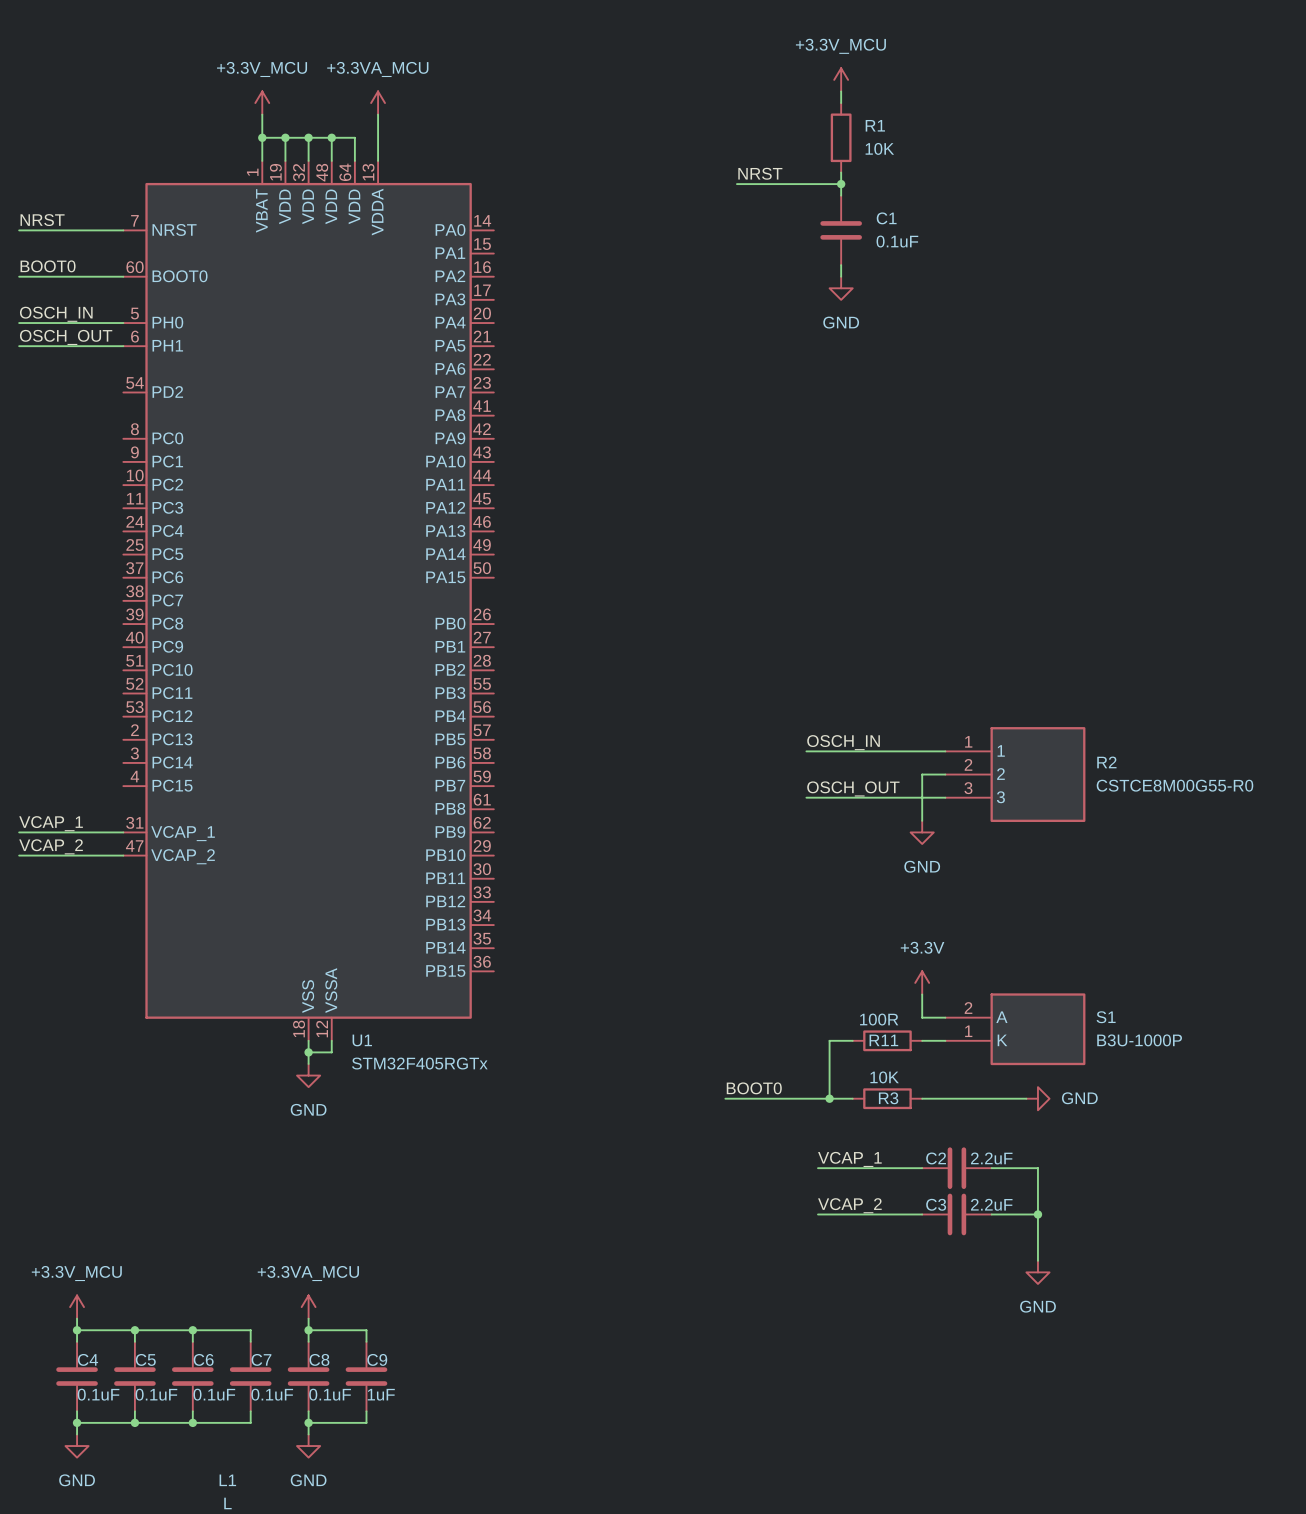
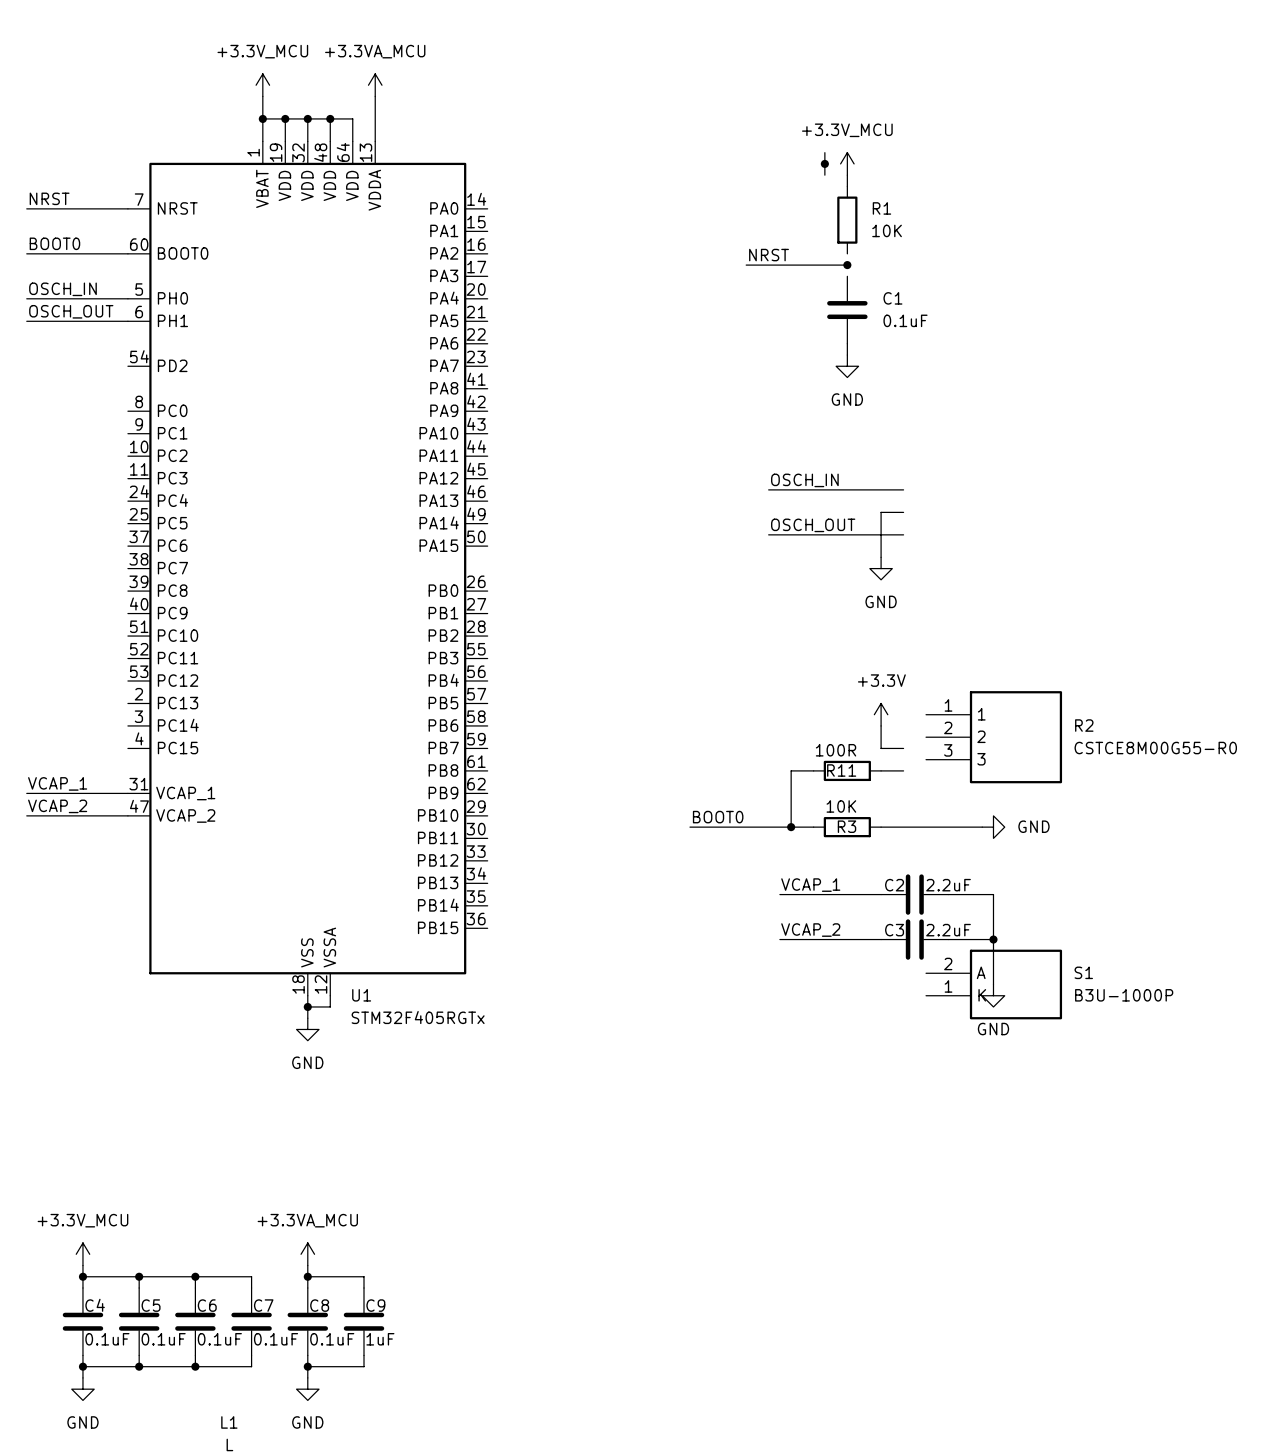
power symbol position: +3.3V_MCU (841, 79) -> +3.3V_MCU (847, 163)
wire: (841, 91) (841, 103) -> (847, 175) (847, 186)
R1 position: (841, 137) -> (847, 220)
label position: NRST (760, 173) -> NRST (769, 255)
wire: (736, 184) (841, 184) -> (746, 265) (847, 265)
C1 position: (841, 230) -> (847, 310)
wire: (841, 265) (841, 276) -> (847, 343) (847, 355)
power symbol position: GND (841, 288) -> GND (847, 366)
junction: none -> (847, 265)
label: none -> OSCH_IN (804, 480)
wire: none -> (768, 489) (903, 489)
wire: none -> (903, 512) (881, 512) (881, 557)
label: none -> OSCH_OUT (813, 525)
power symbol: none -> GND (881, 568)
label: OSCH_IN (843, 742) -> none
wire: (806, 751) (945, 751) -> (768, 534) (903, 534)
power symbol: none -> +3.3V (881, 714)
wire: none -> (881, 725) (881, 748) (903, 748)
wire: (945, 774) (922, 774) (922, 820) -> none
label: OSCH_OUT (853, 788) -> none
wire: (806, 797) (945, 797) -> none
wire: none -> (813, 770) (791, 770) (791, 827)
wire: none -> (881, 770) (903, 770)
power symbol rotation: 0° (922, 832) -> 90° counterclockwise (993, 827)
power symbol position: GND (922, 832) -> GND (993, 827)
label: none -> BOOT0 (718, 817)
wire: none -> (689, 827) (813, 827)
junction: none -> (791, 827)
wire: none -> (881, 827) (982, 827)
label: none -> VCAP_1 (810, 885)
wire: none -> (948, 894) (993, 894) (993, 984)
label: none -> VCAP_2 (810, 930)
power symbol: +3.3V (922, 982) -> none
wire: none -> (948, 939) (993, 939)
junction: none -> (993, 939)
wire: (922, 994) (922, 1017) (945, 1017) -> none
wire: (852, 1040) (829, 1040) (829, 1098) -> none
R11 position: (887, 1040) -> (847, 770)
wire: (922, 1040) (945, 1040) -> none
label: BOOT0 (754, 1088) -> none
wire: (725, 1098) (852, 1098) -> none
junction: (829, 1098) -> none
R3 position: (887, 1098) -> (847, 827)
wire: (922, 1098) (1026, 1098) -> (779, 894) (881, 894)
power symbol rotation: 0° (1037, 1098) -> 90° clockwise (993, 995)
power symbol position: GND (1037, 1098) -> GND (993, 995)
label: VCAP_1 (849, 1159) -> none
wire: (818, 1168) (922, 1168) -> (779, 939) (881, 939)
C2 position: (956, 1168) -> (914, 894)
wire: (991, 1168) (1037, 1168) (1037, 1260) -> none
label: VCAP_2 (849, 1205) -> none
wire: (818, 1214) (922, 1214) -> none
C3 position: (956, 1214) -> (914, 939)
wire: (991, 1214) (1037, 1214) -> none
junction: (1037, 1214) -> none
power symbol: GND (1037, 1272) -> none

